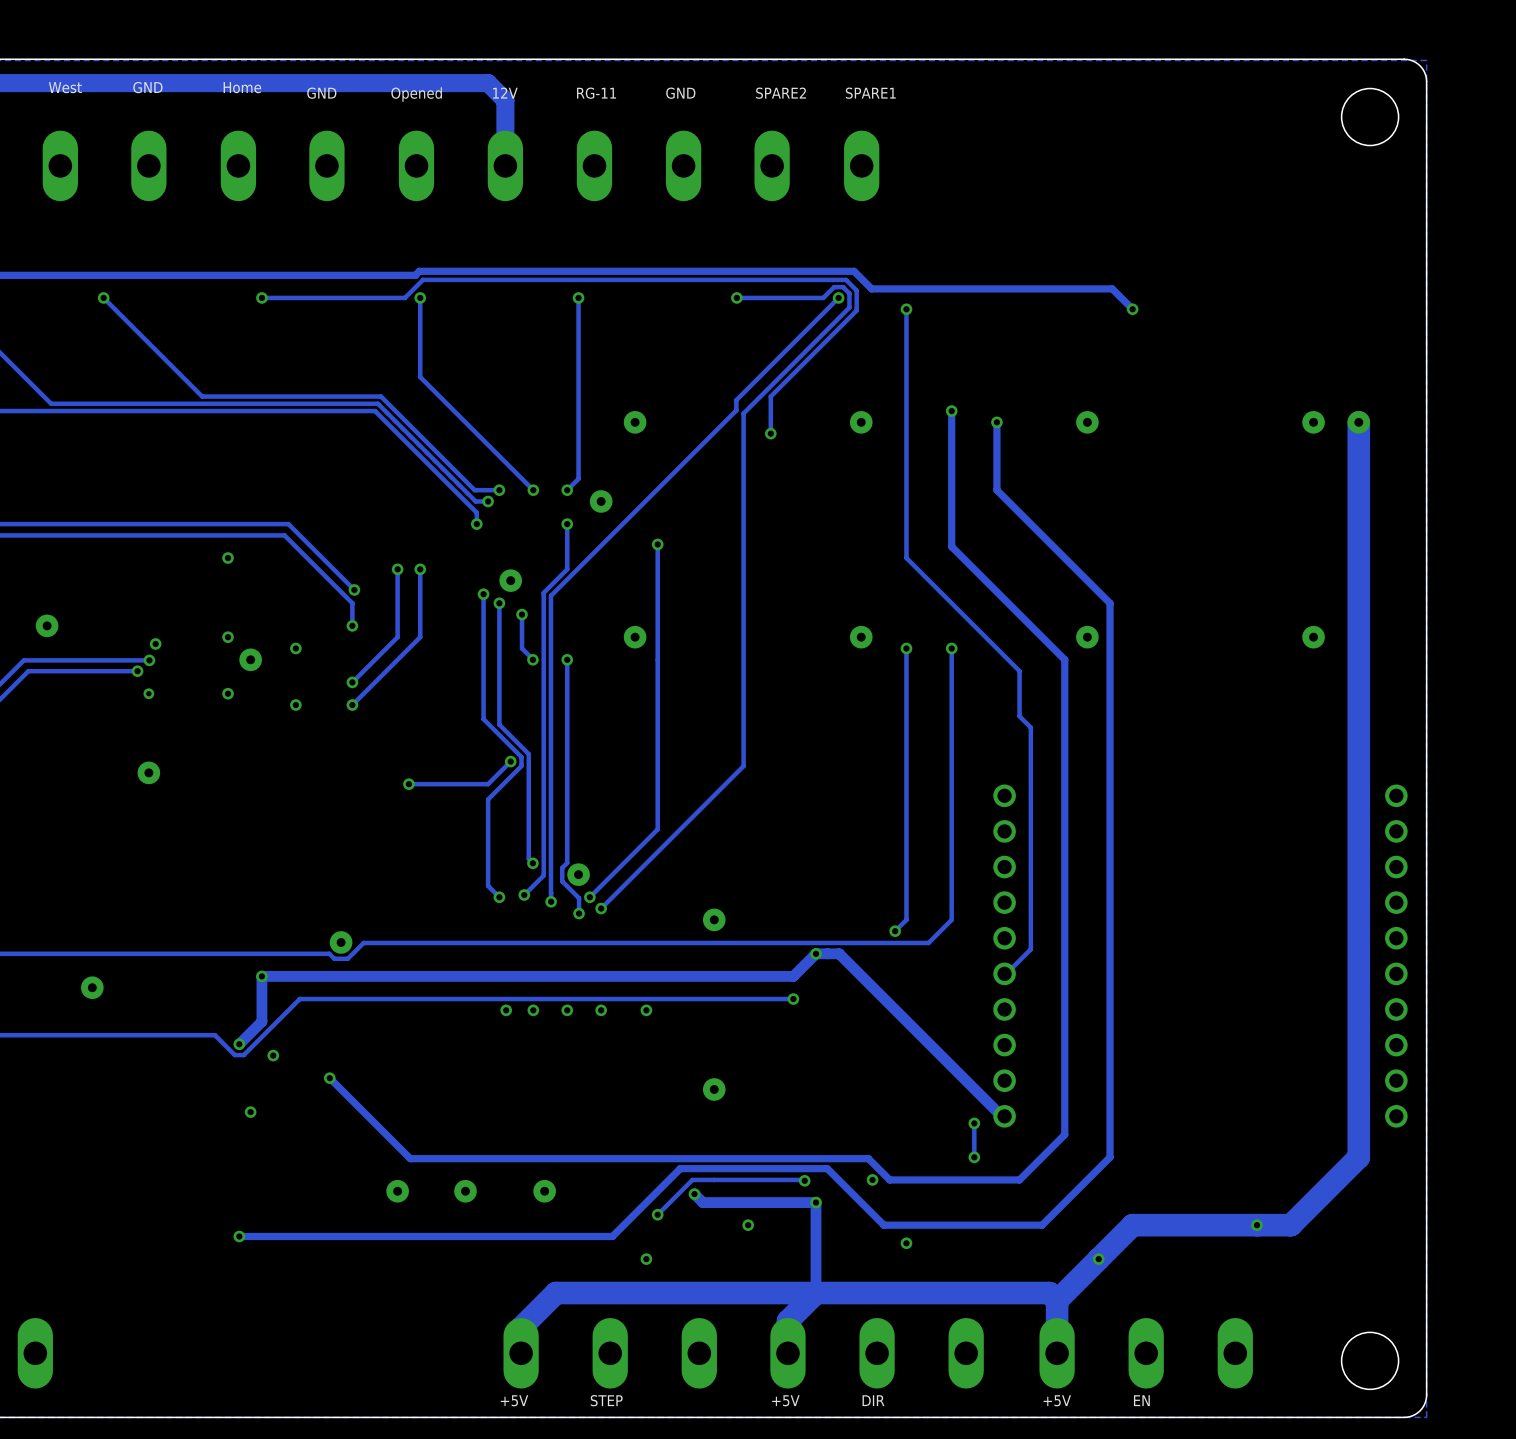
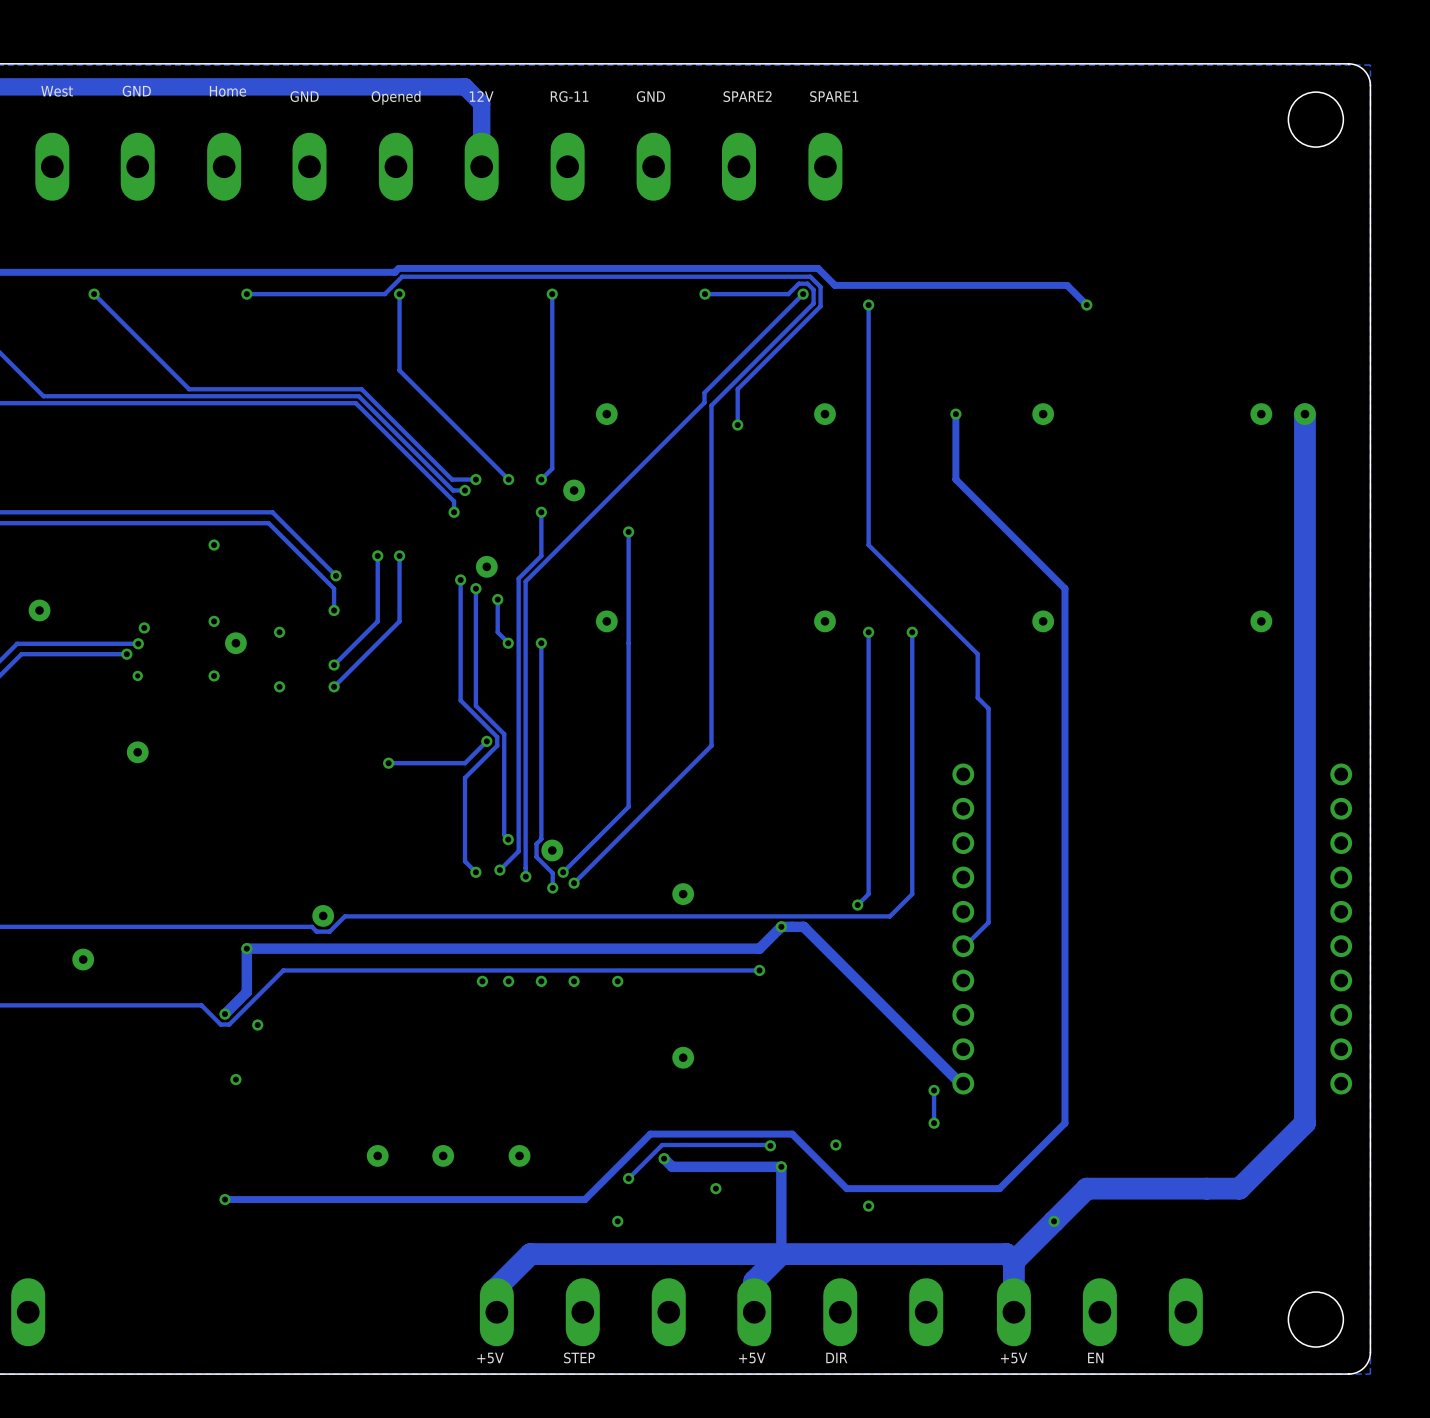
track: (951, 411) (951, 546) (1064, 659) (1064, 1134) (1019, 1179) (889, 1179) (868, 1158) (410, 1158) (329, 1078) -> none
via: (951, 411) -> none
via: (329, 1078) -> none
via: (1257, 1225) -> none

